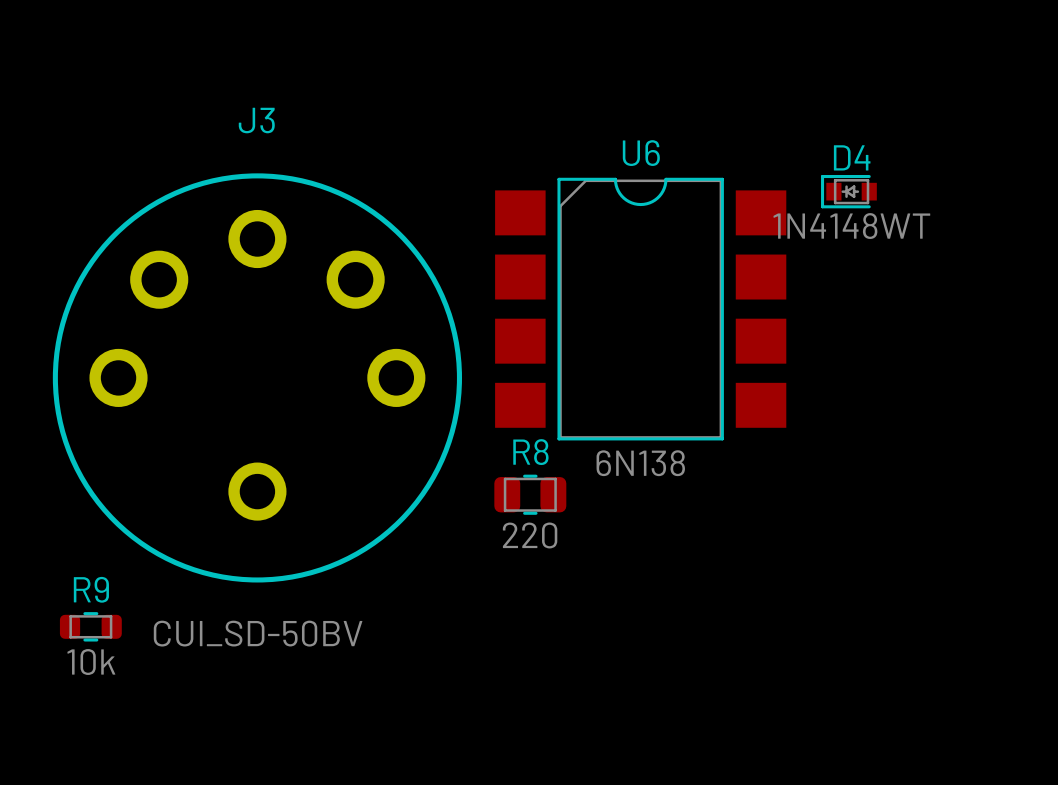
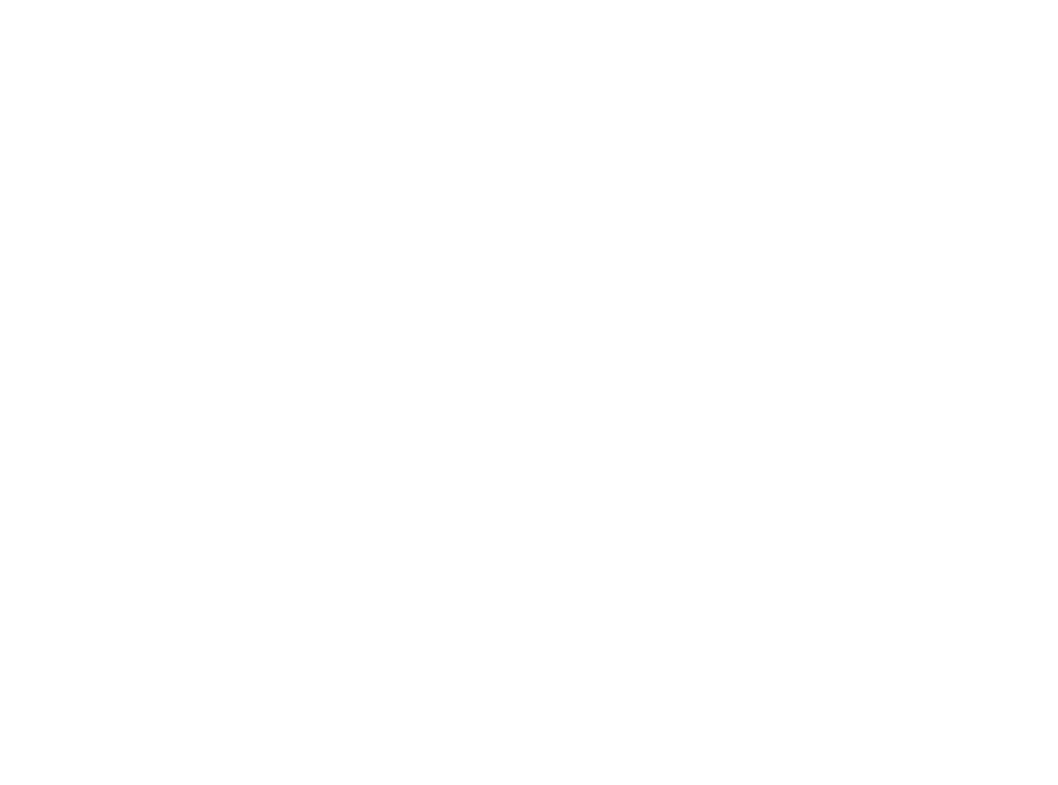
D4: 1N4148WT (848, 191) -> none
U6: 6N138 (640, 309) -> none
J3: CUI_SD-50BV (257, 377) -> none
R8: 220 (530, 494) -> none
R9: 10k (90, 626) -> none

